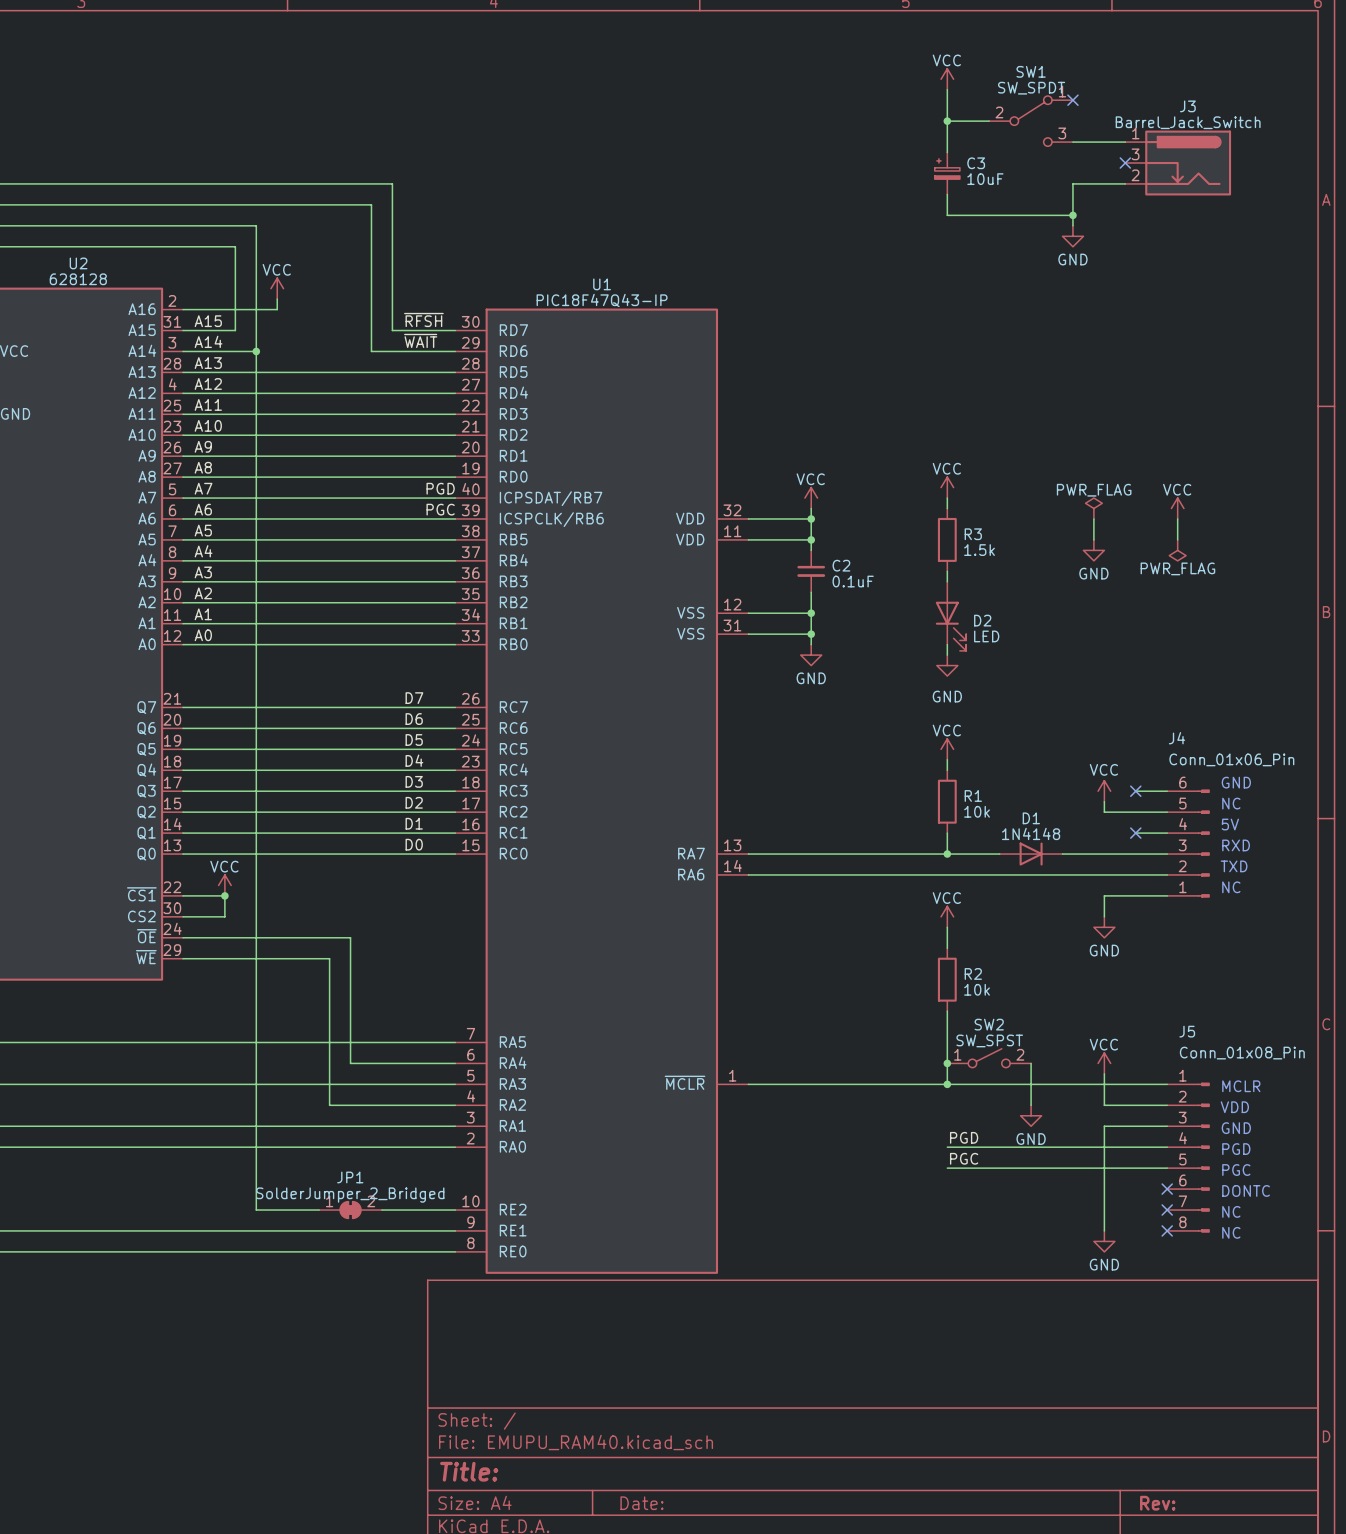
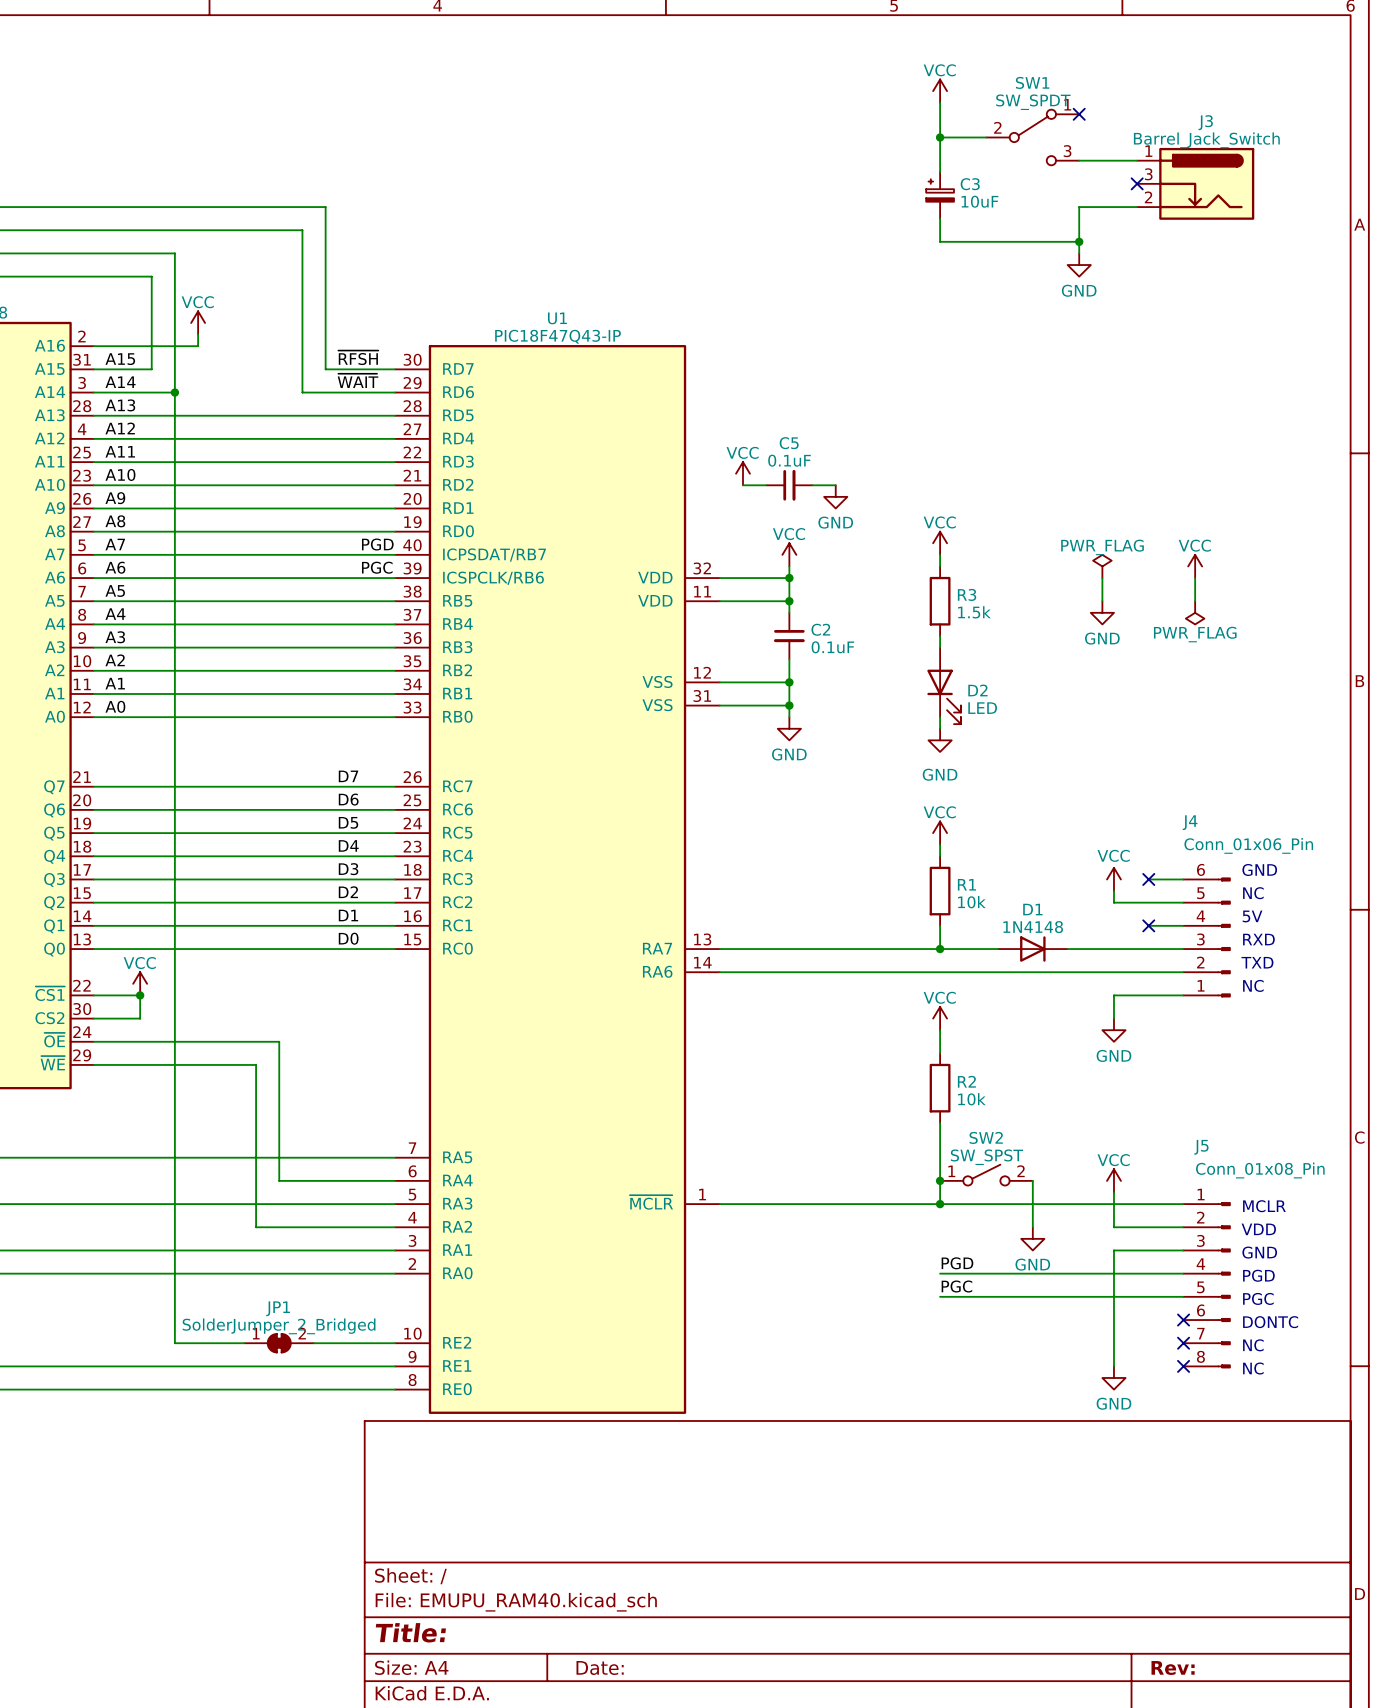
power symbol: none -> VCC (742, 473)
wire: none -> (742, 485) (766, 485)
C5: none -> 0.1uF (789, 485)
wire: none -> (812, 485) (835, 485)
power symbol: none -> GND (835, 496)

